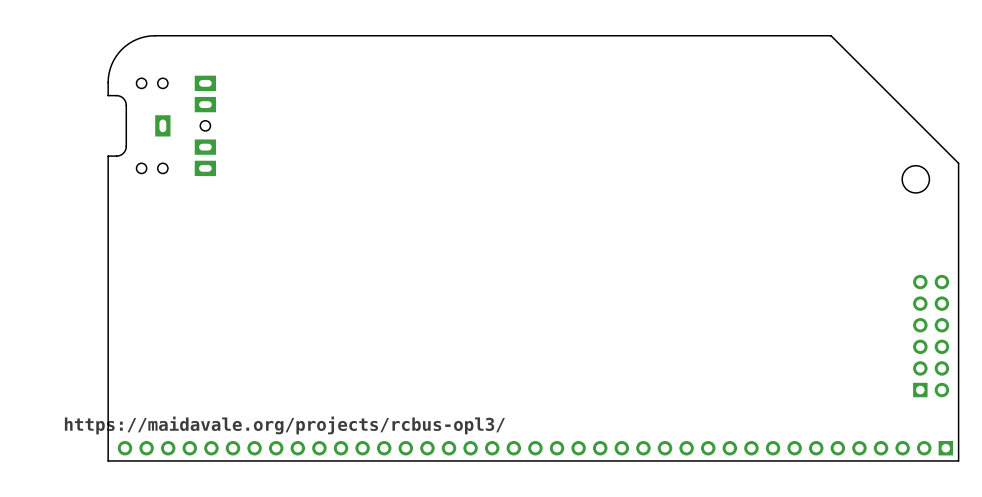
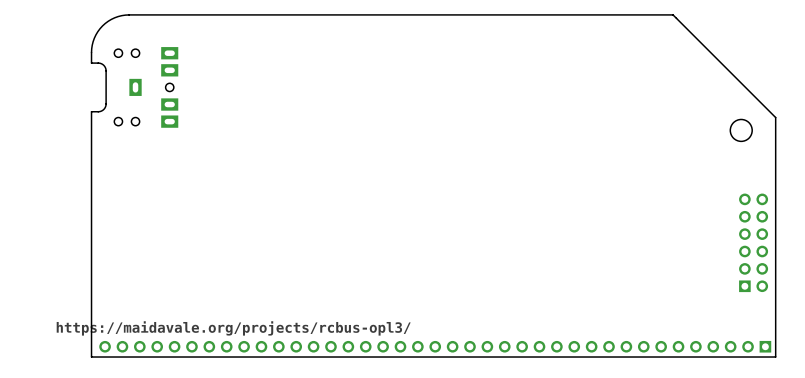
part position: (931, 336) -> (753, 242)

